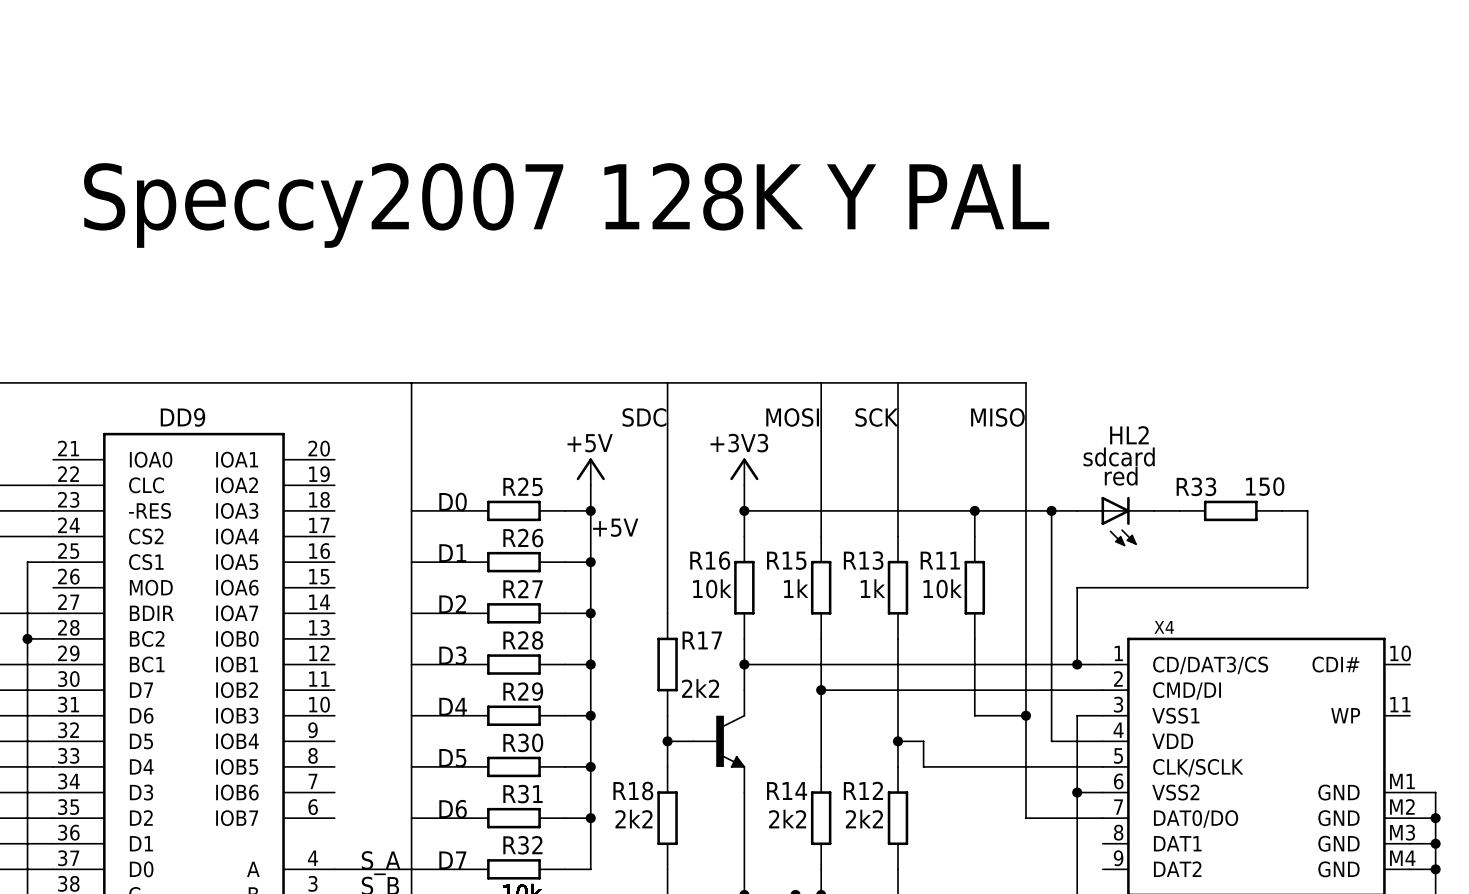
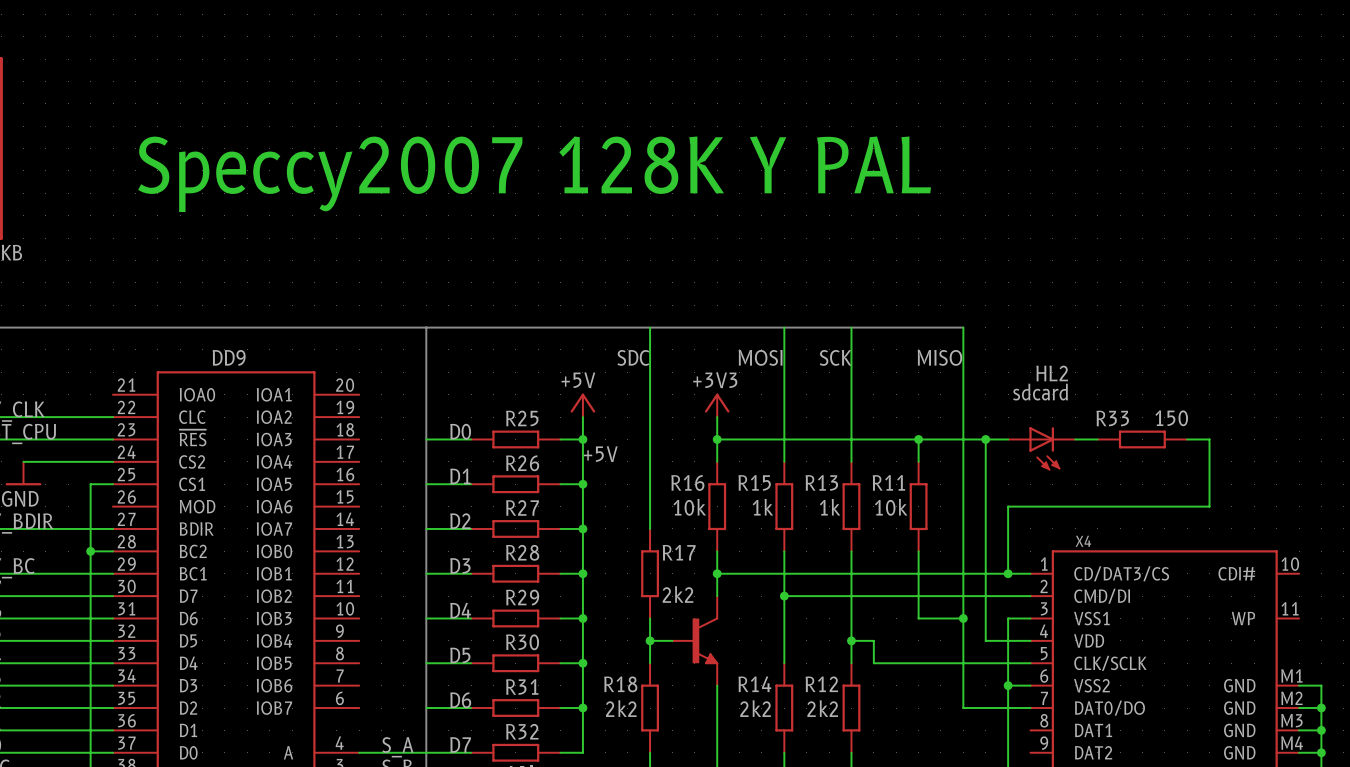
text: red (1121, 476) -> none
DD9 pin name: -RES (149, 510) -> ~{RES} (193, 438)

